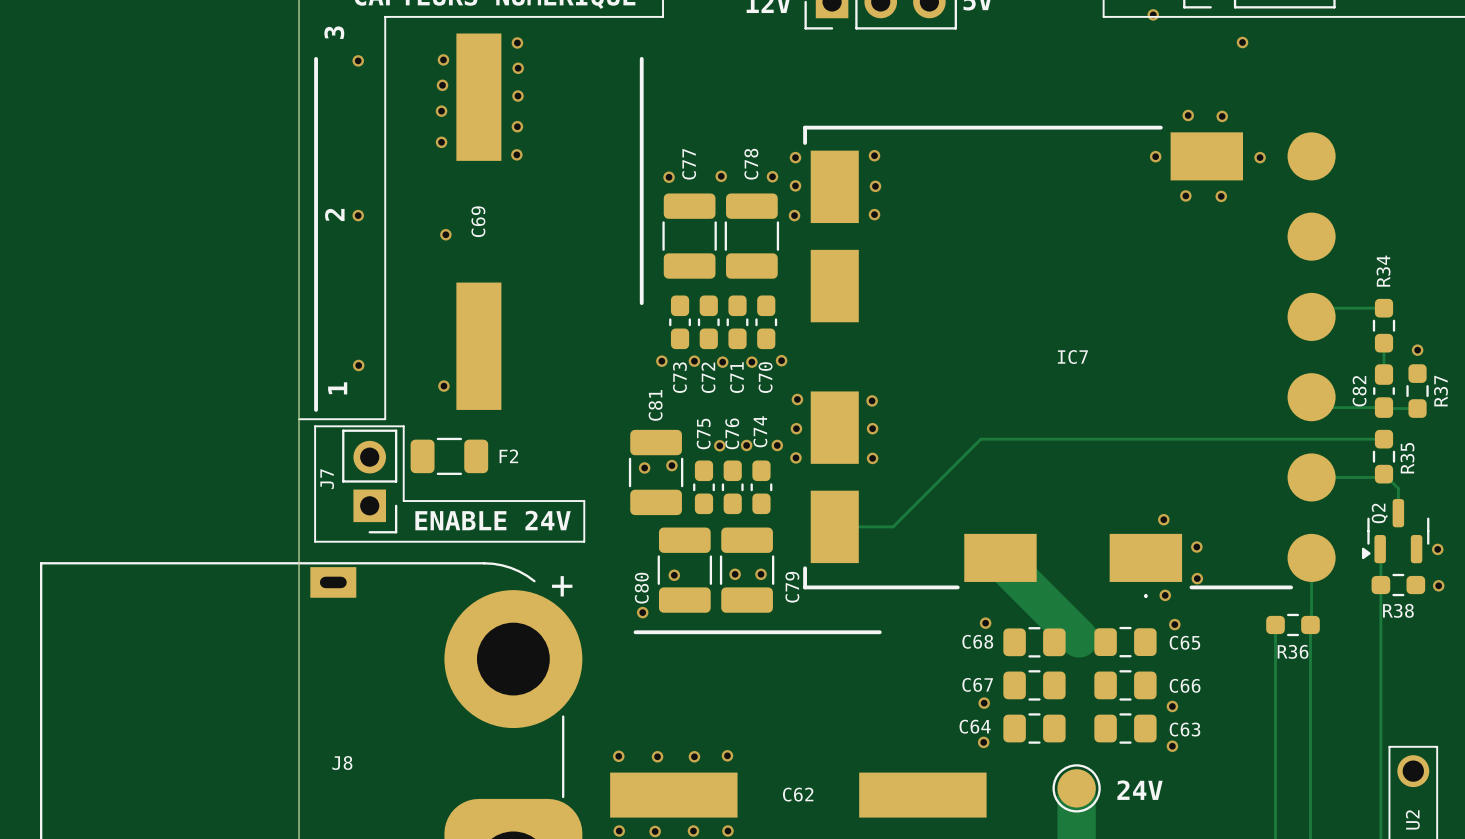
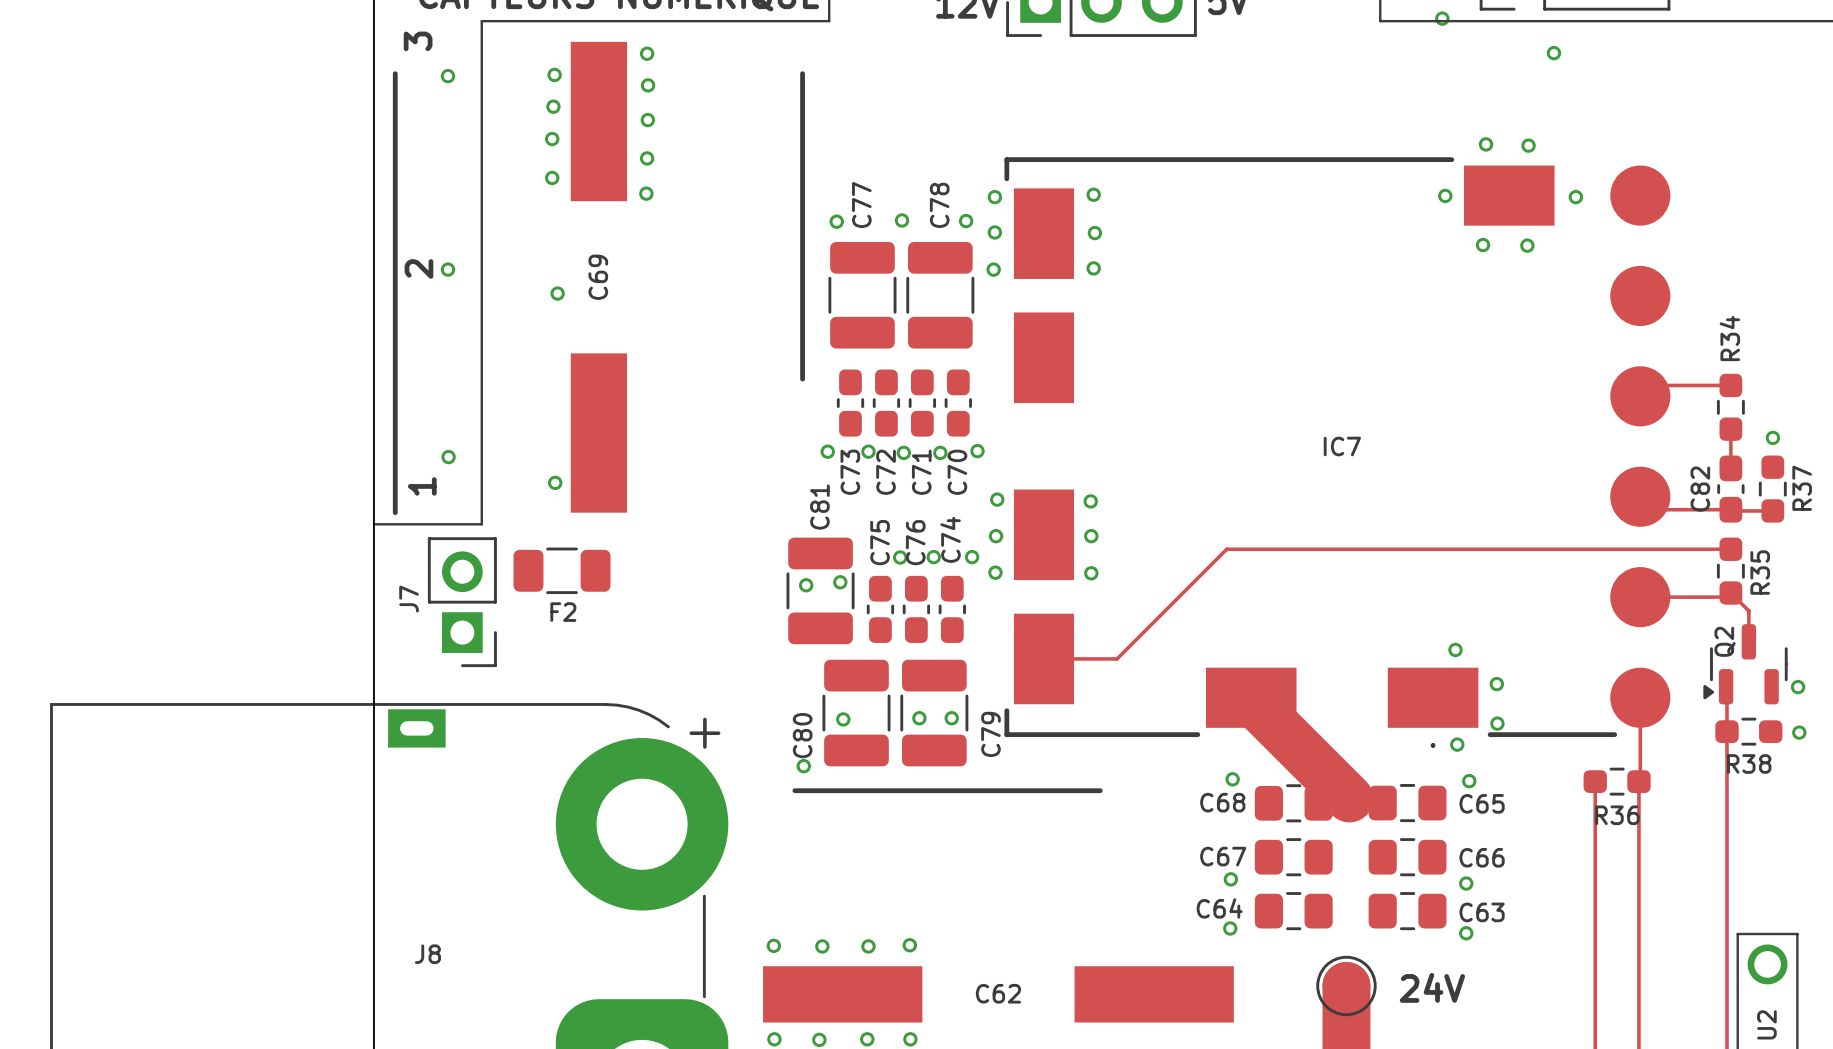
line: (315, 426) (315, 541) (584, 541) (584, 501) (403, 501) (403, 426) (315, 426) -> none
F2 name position: F2 (508, 456) -> F2 (563, 612)
text: ENABLE 24V (493, 520) -> none

